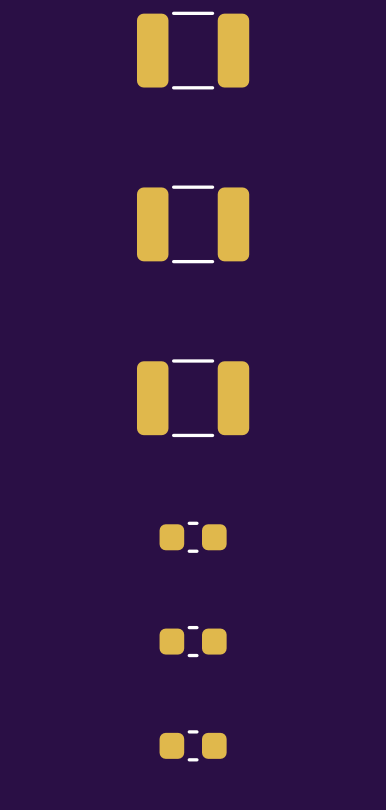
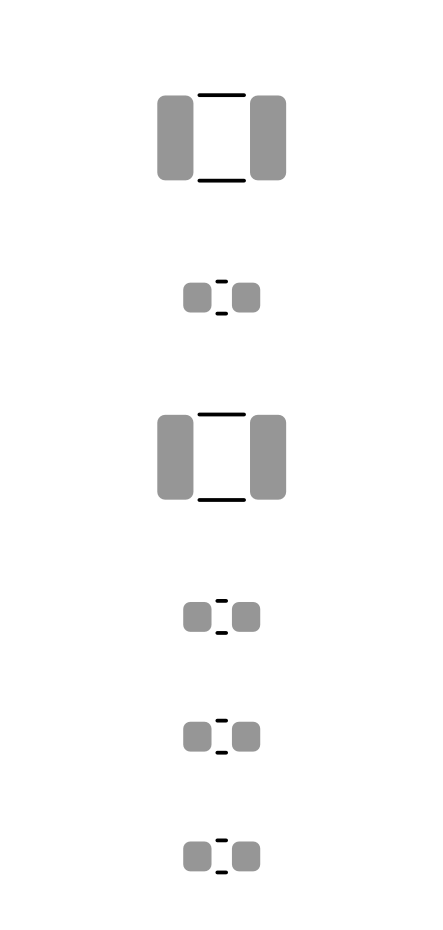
part: (193, 50) -> none
part: none -> (221, 137)
part: (193, 224) -> none
part: none -> (221, 297)

